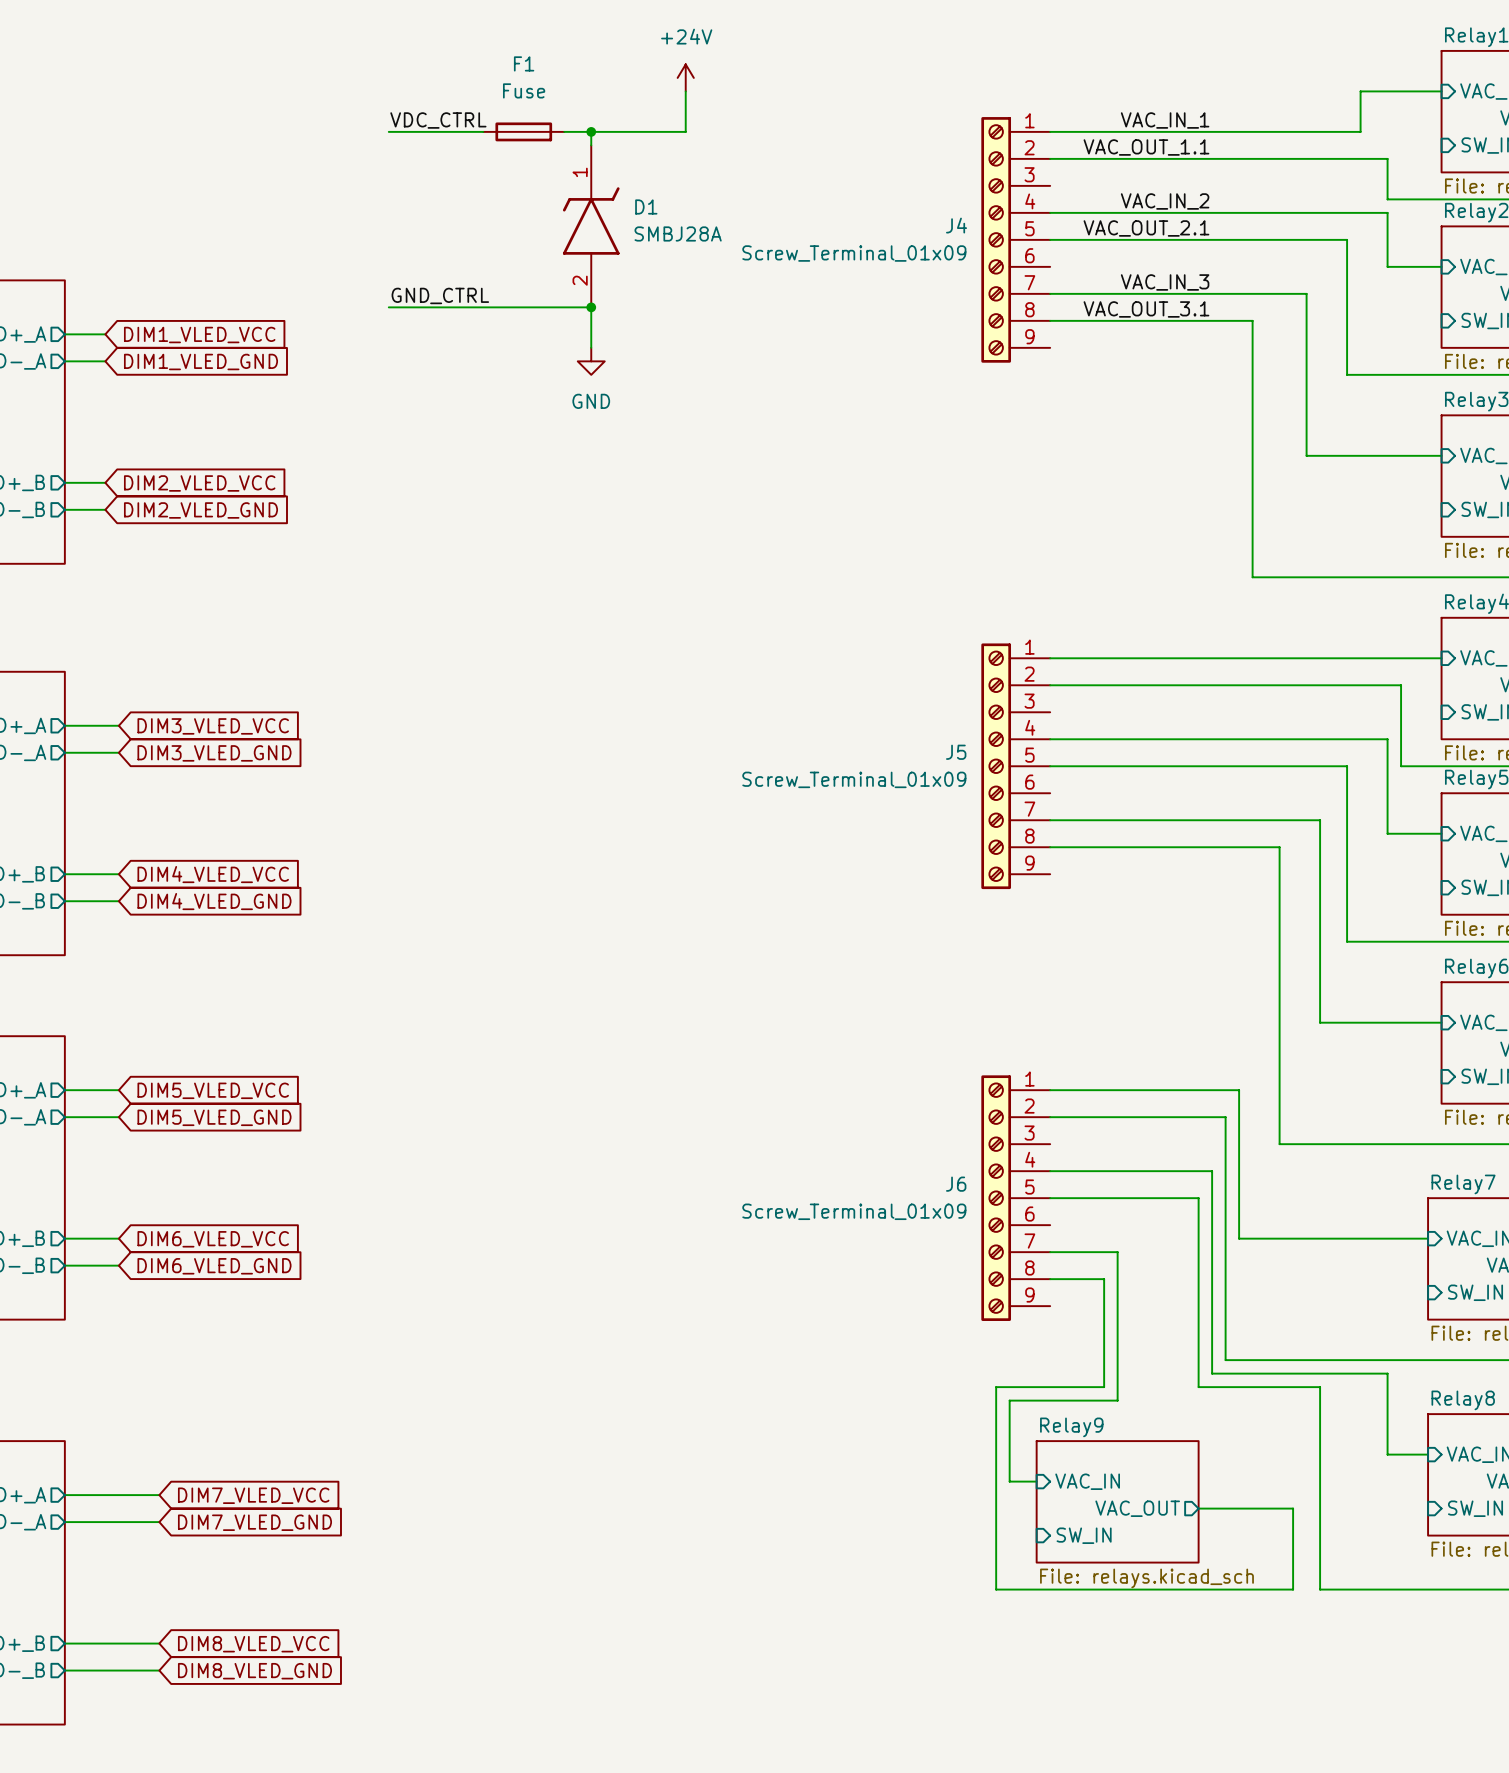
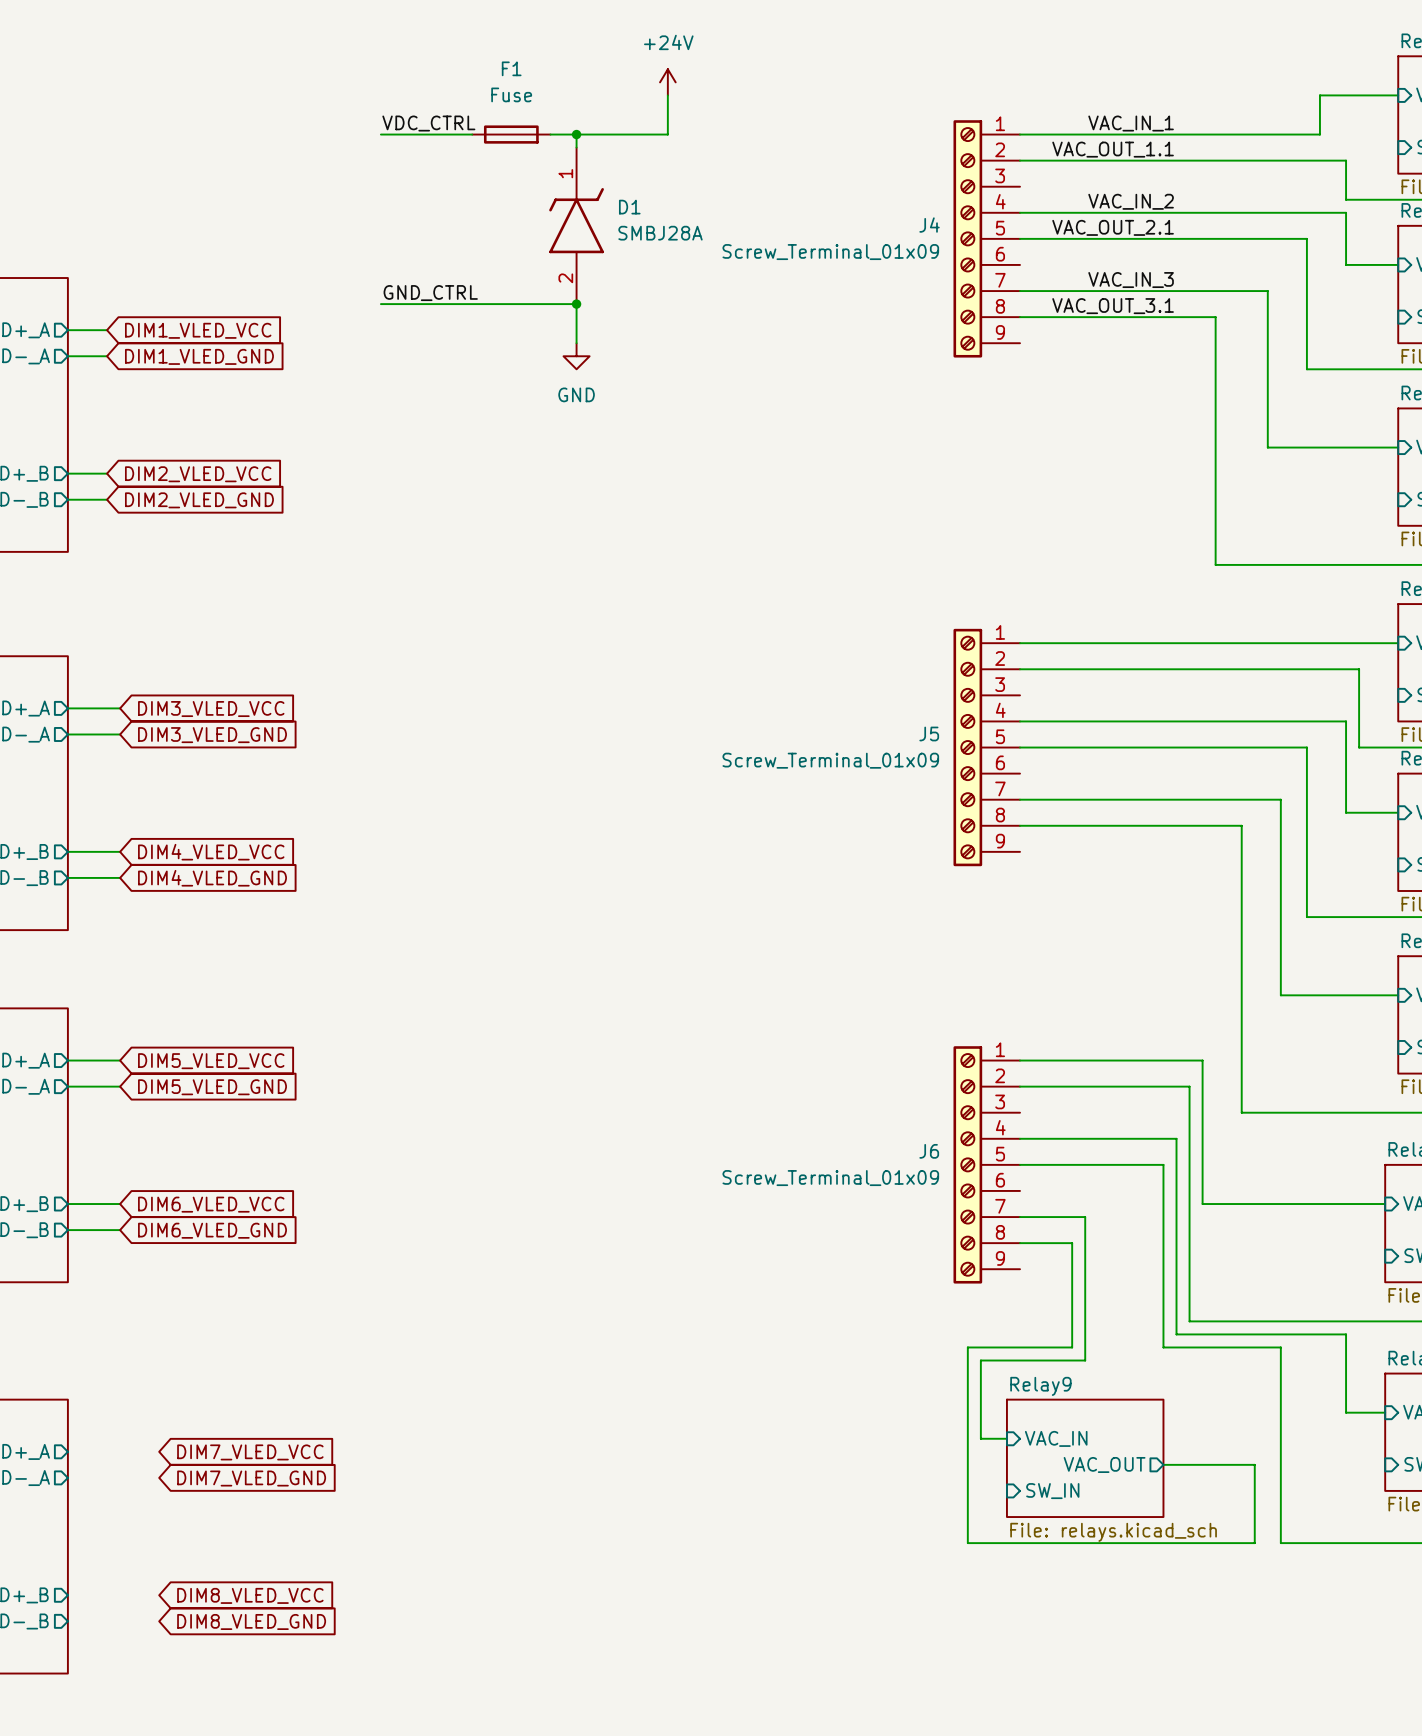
wire: (64, 1495) (159, 1495) -> none
wire: (64, 1522) (159, 1522) -> none
wire: (64, 1643) (159, 1643) -> none
wire: (64, 1670) (159, 1670) -> none

